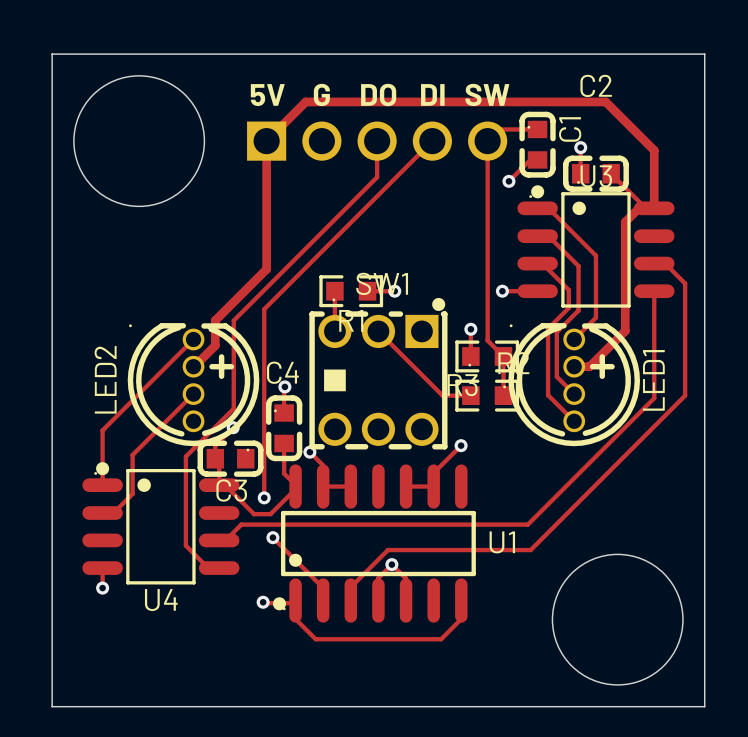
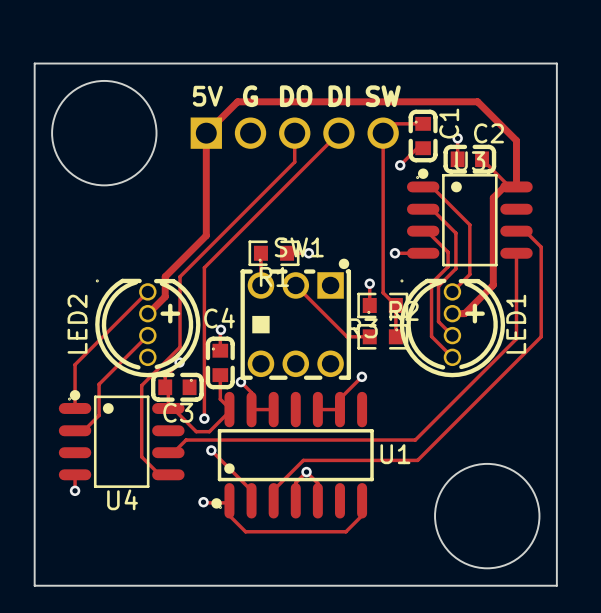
C2 name position: C2 (596, 85) -> C2 (488, 133)

